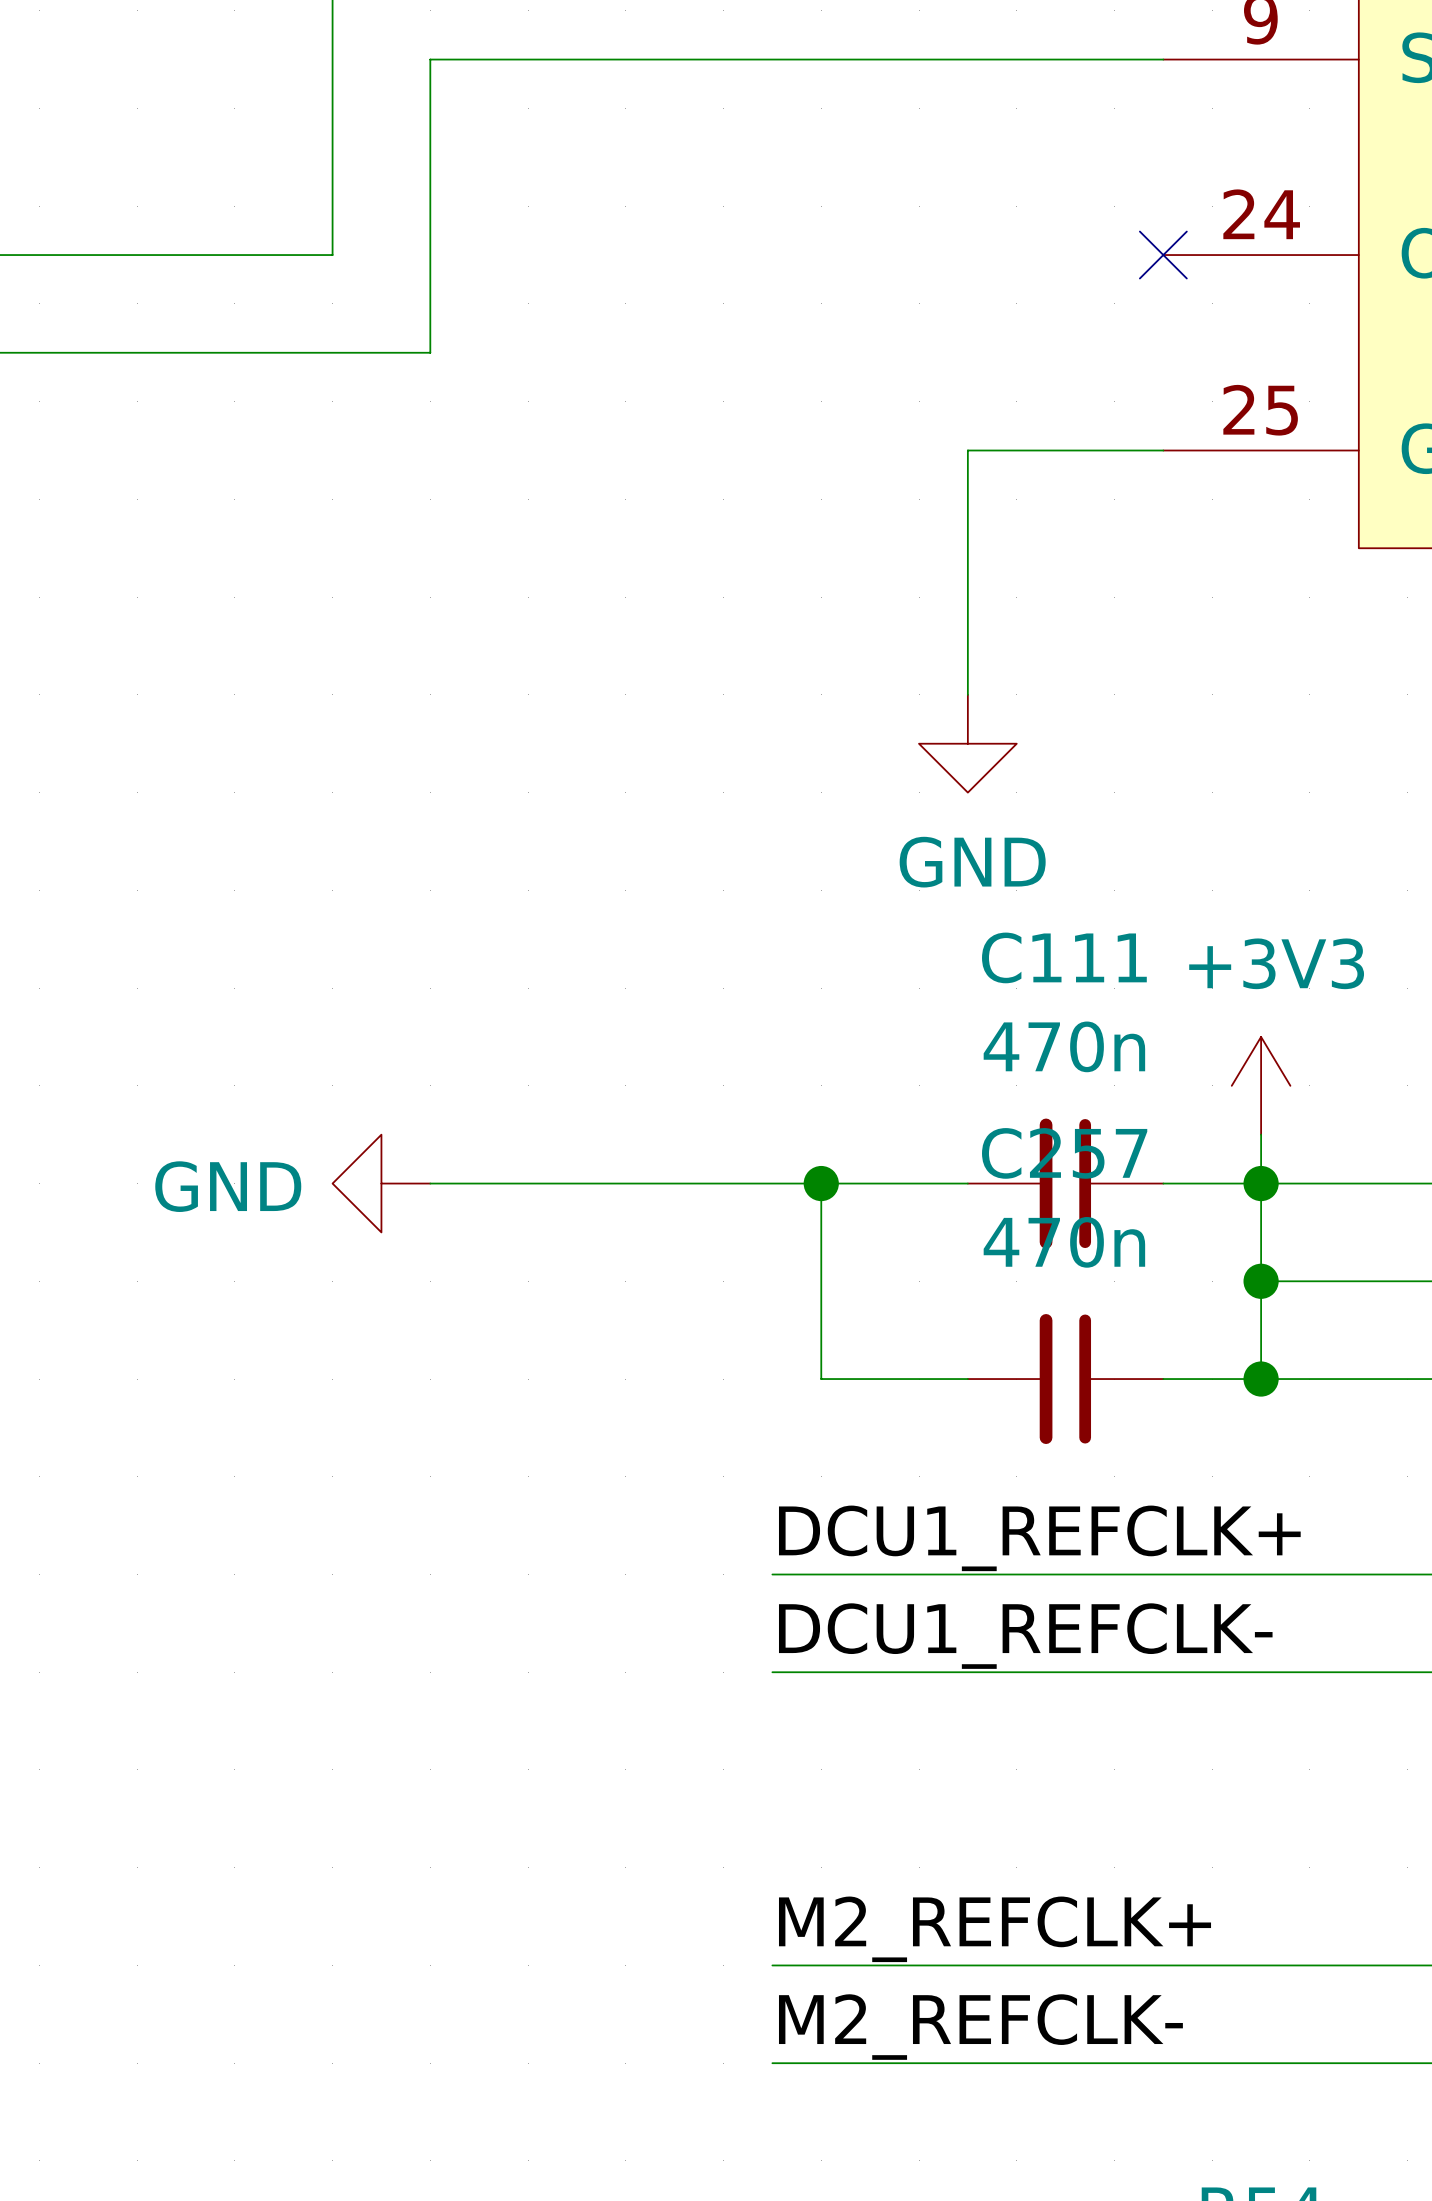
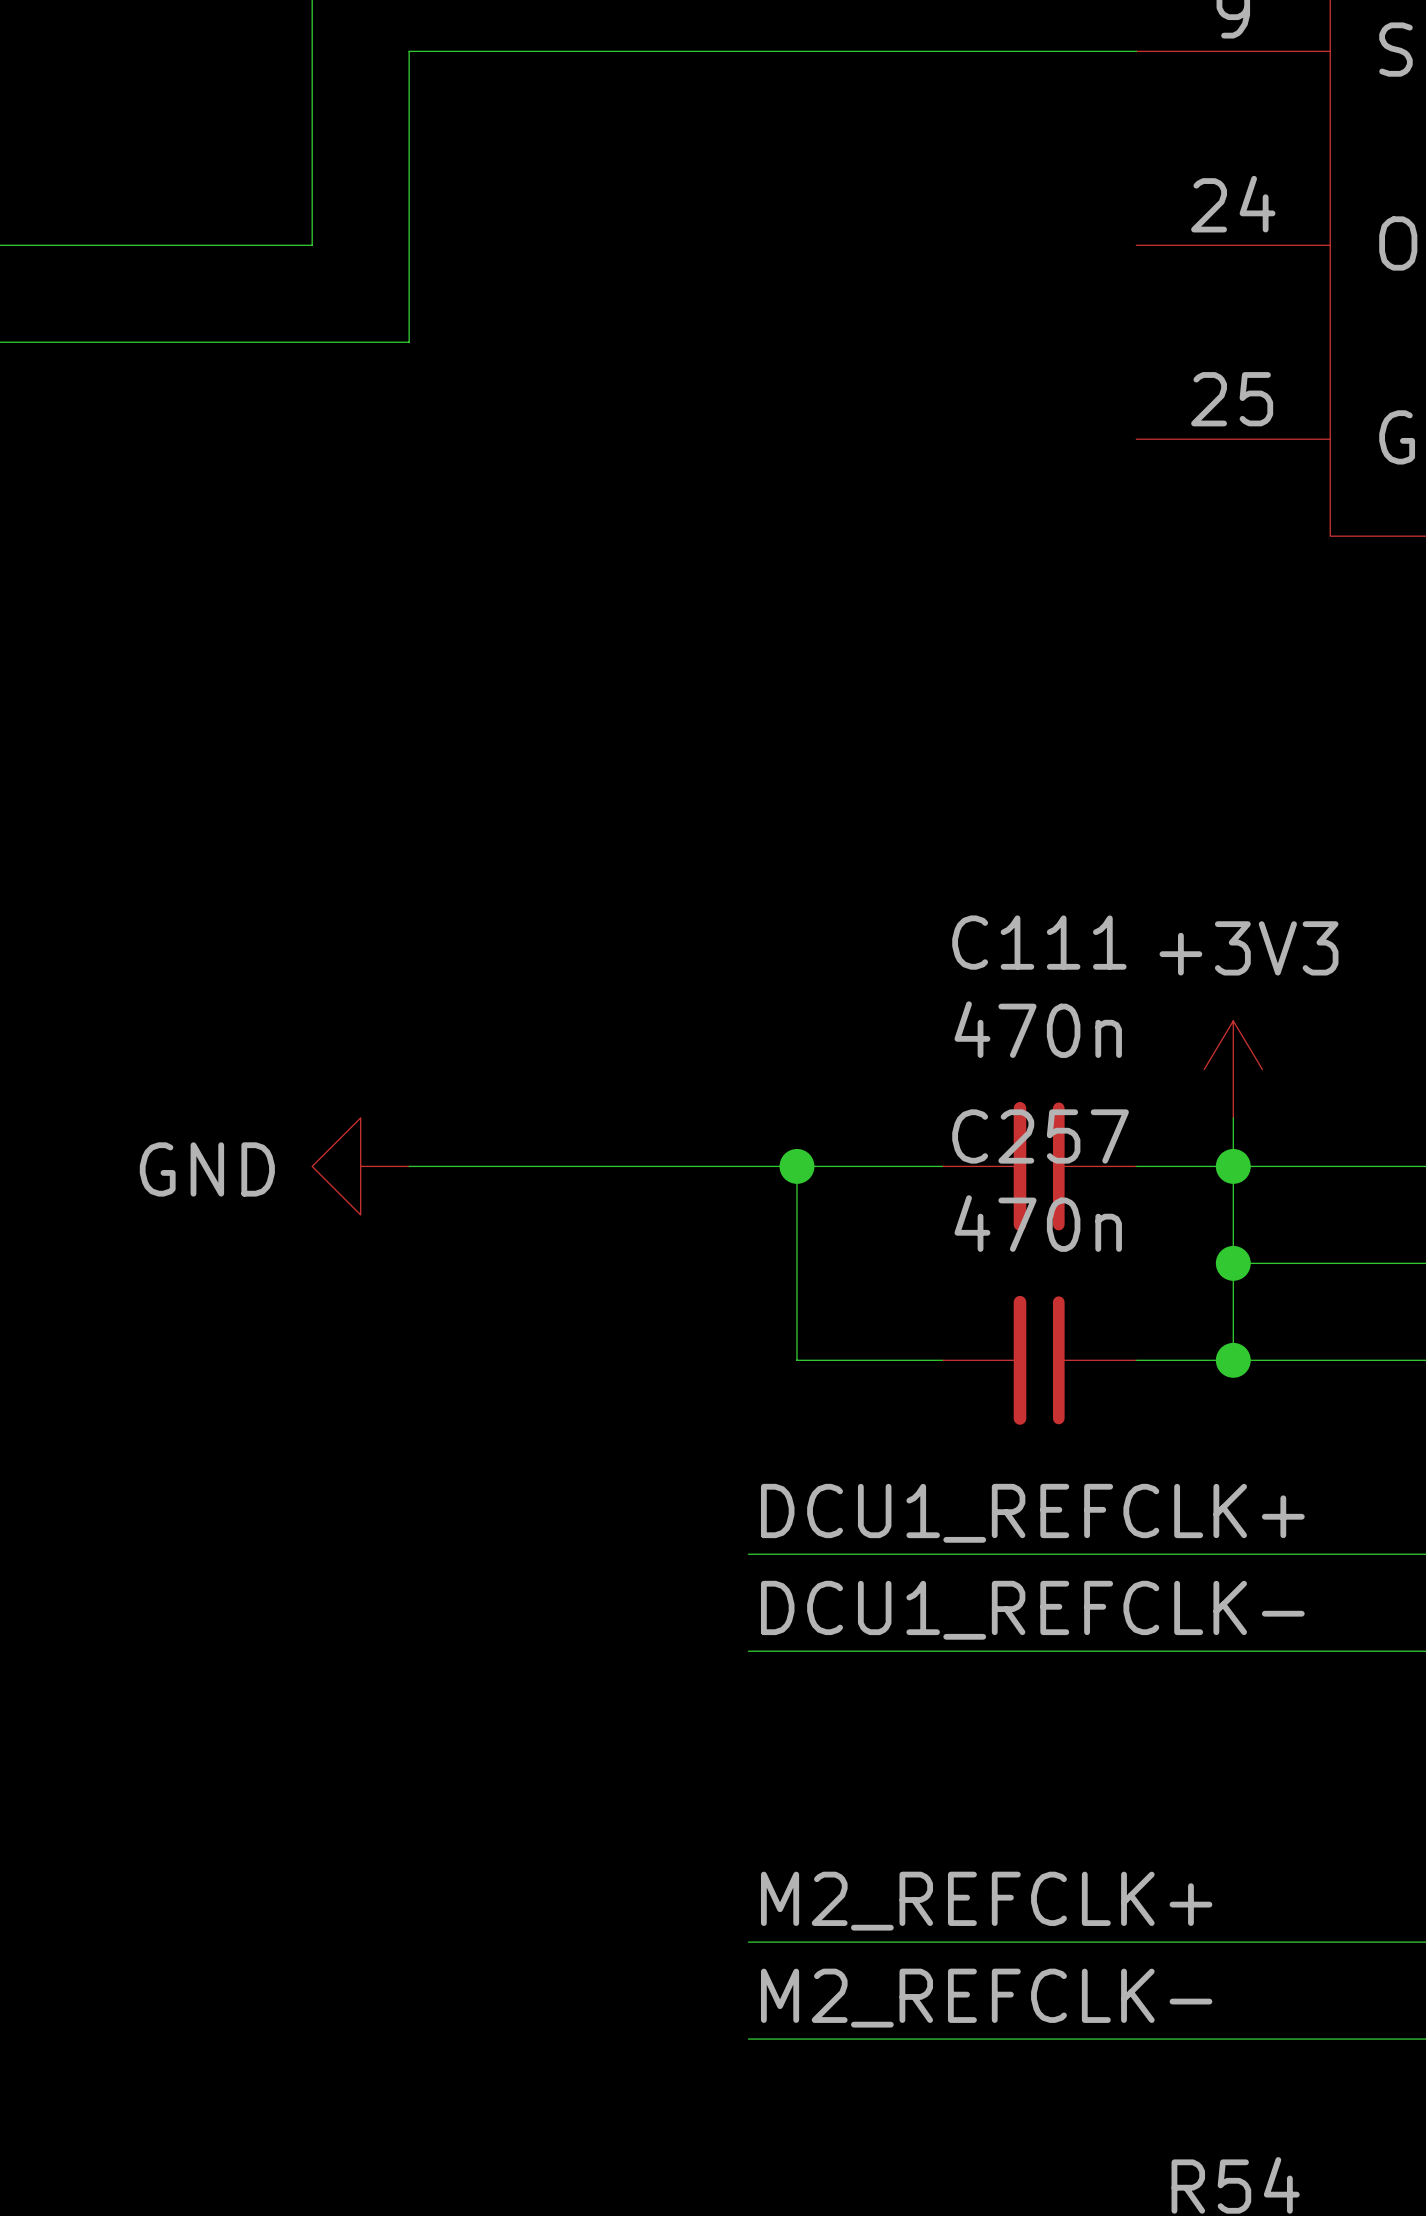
no-connect mark: (1163, 255) -> none
wire: (1163, 450) (967, 450) (967, 694) -> none
power symbol: GND (967, 743) -> none

